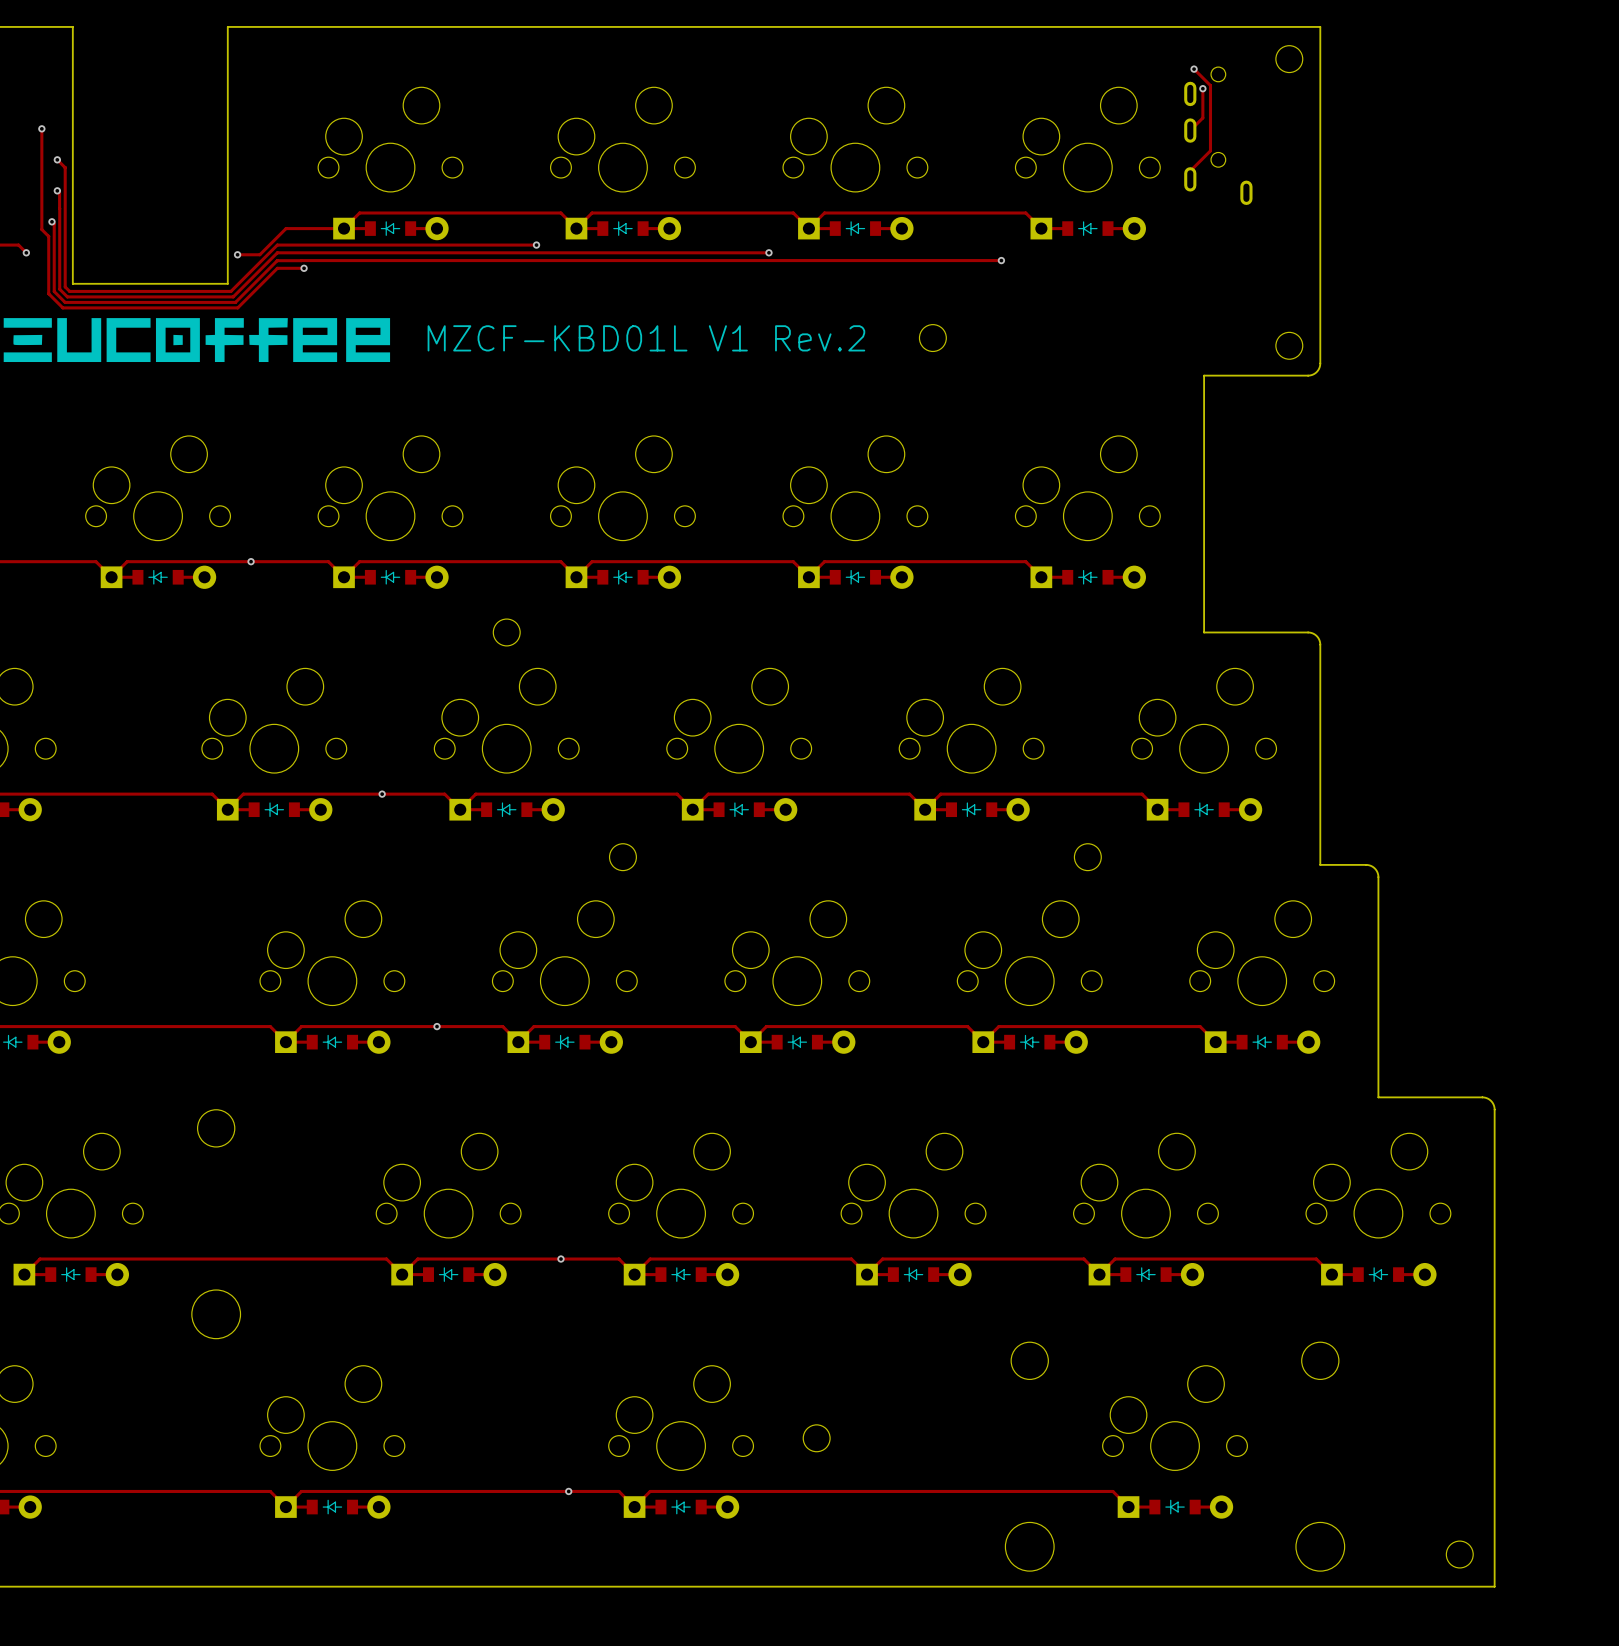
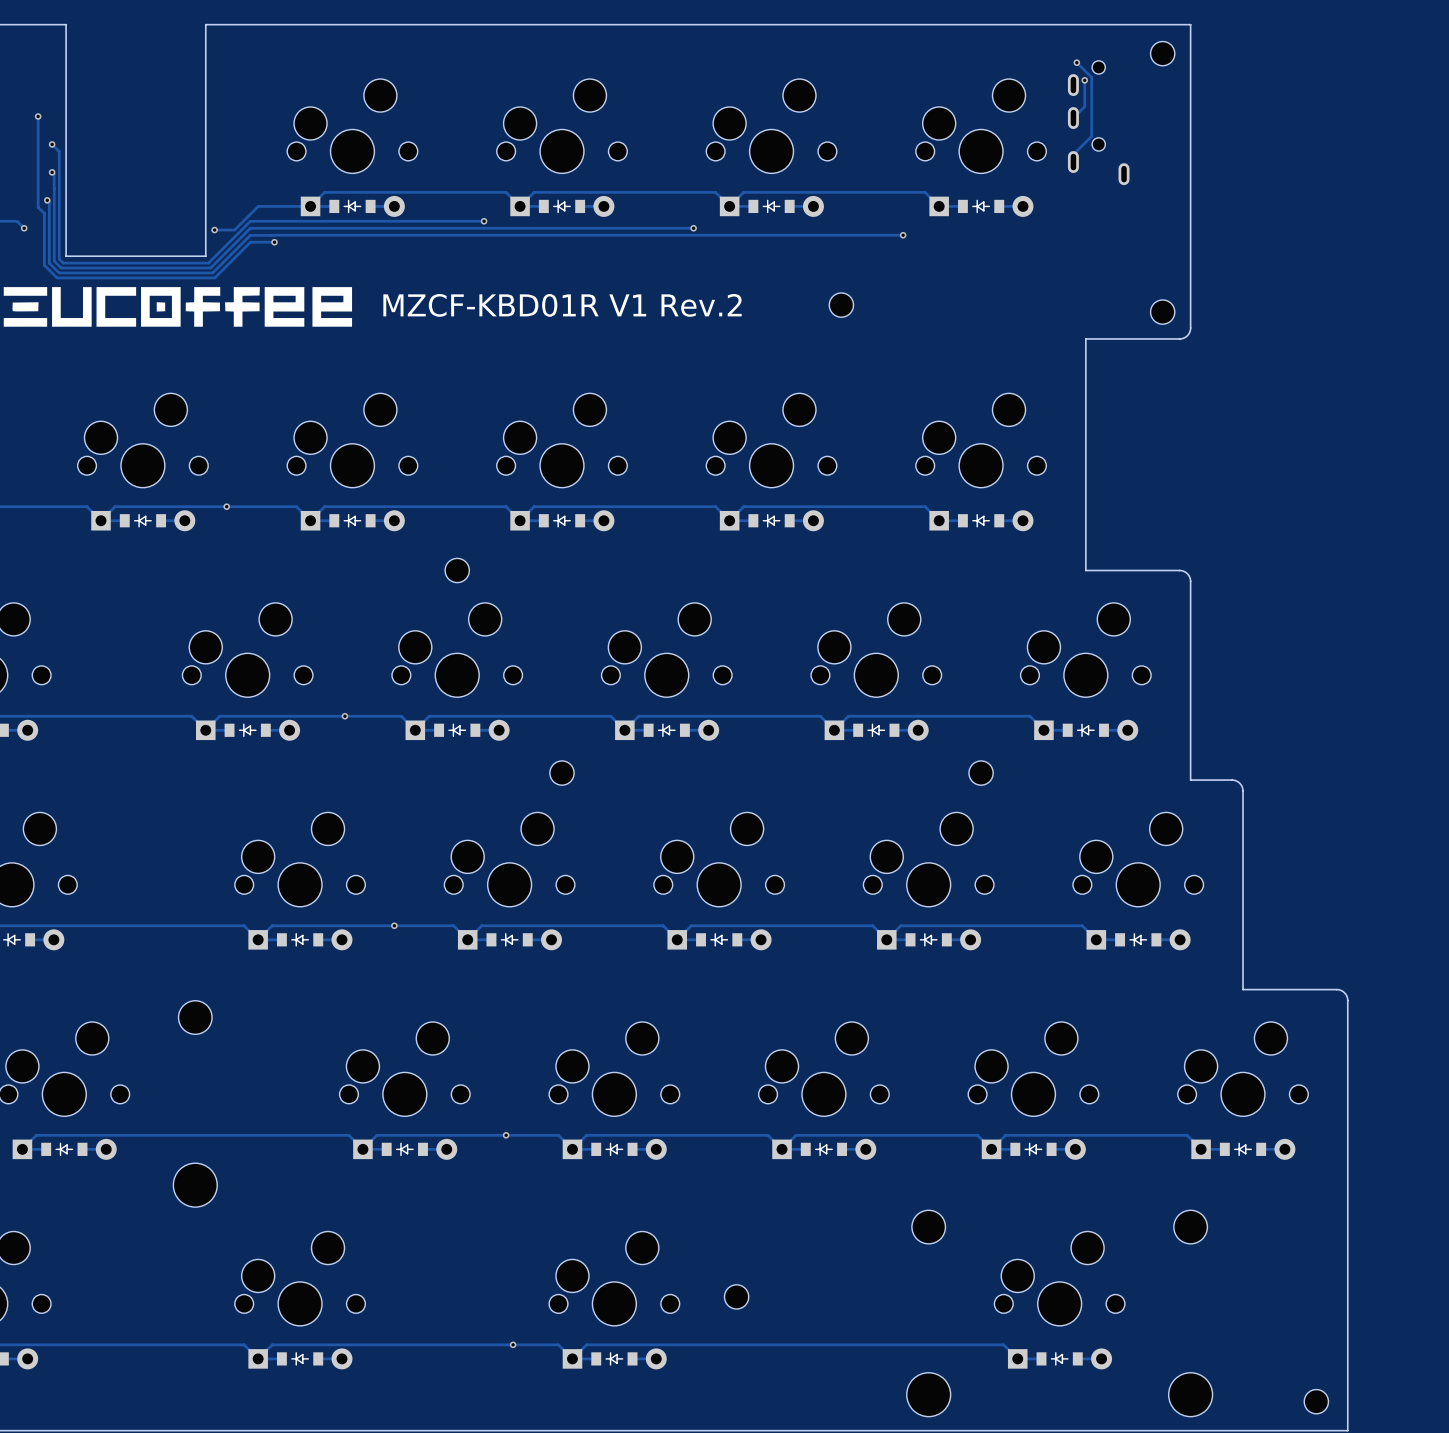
text: MZCF-KBD01L V1 Rev.2 (646, 338) -> MZCF-KBD01R V1 Rev.2 (562, 305)

